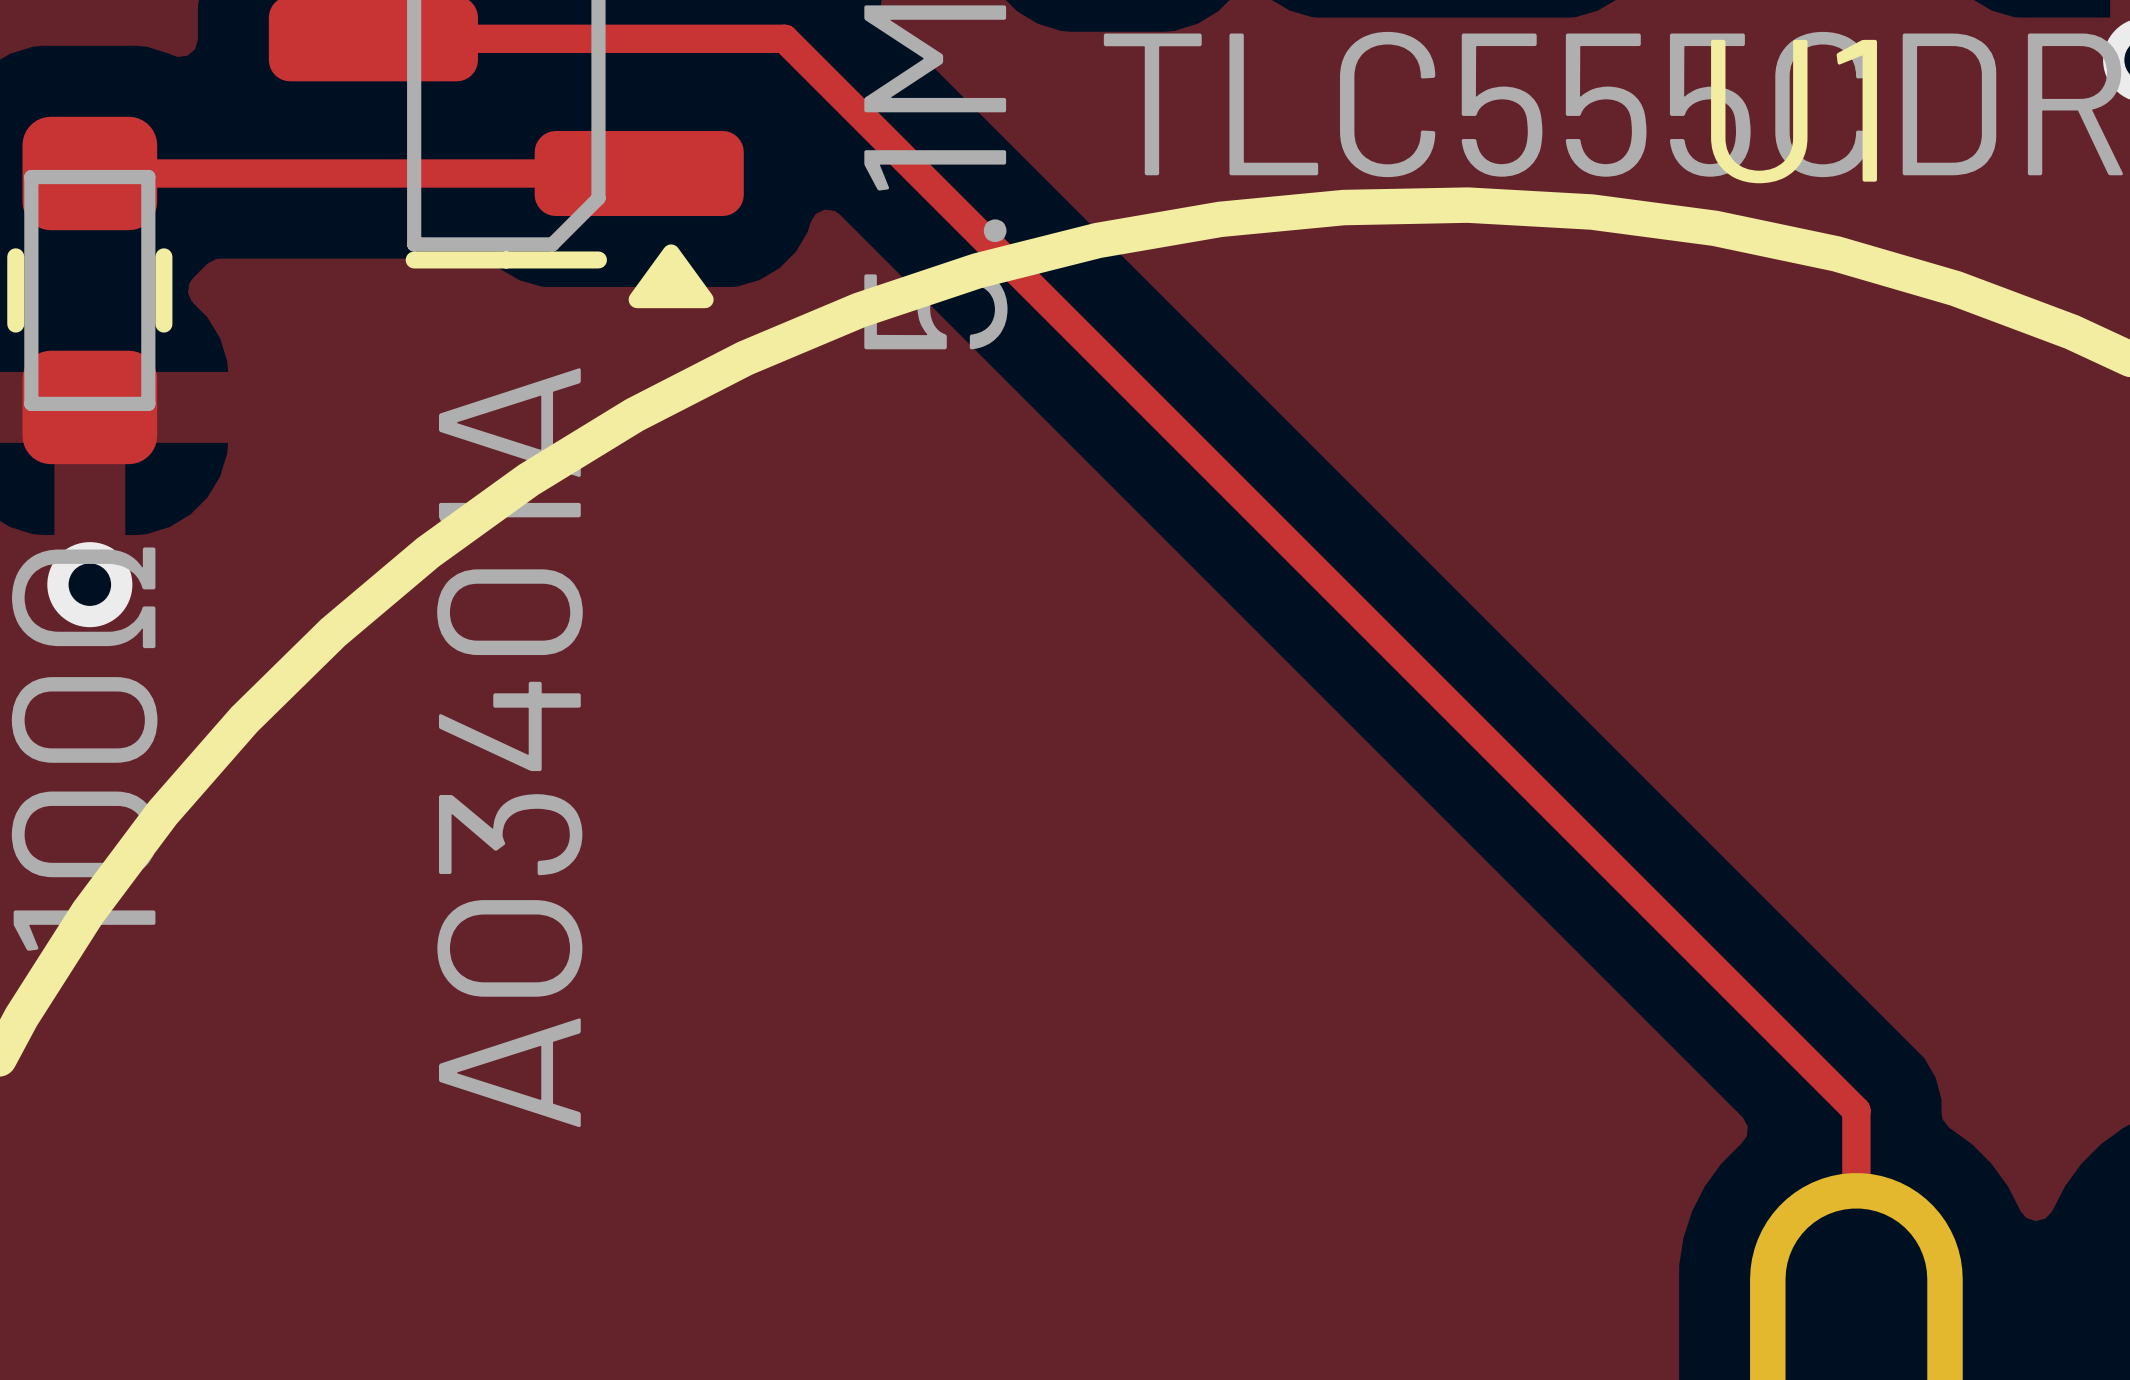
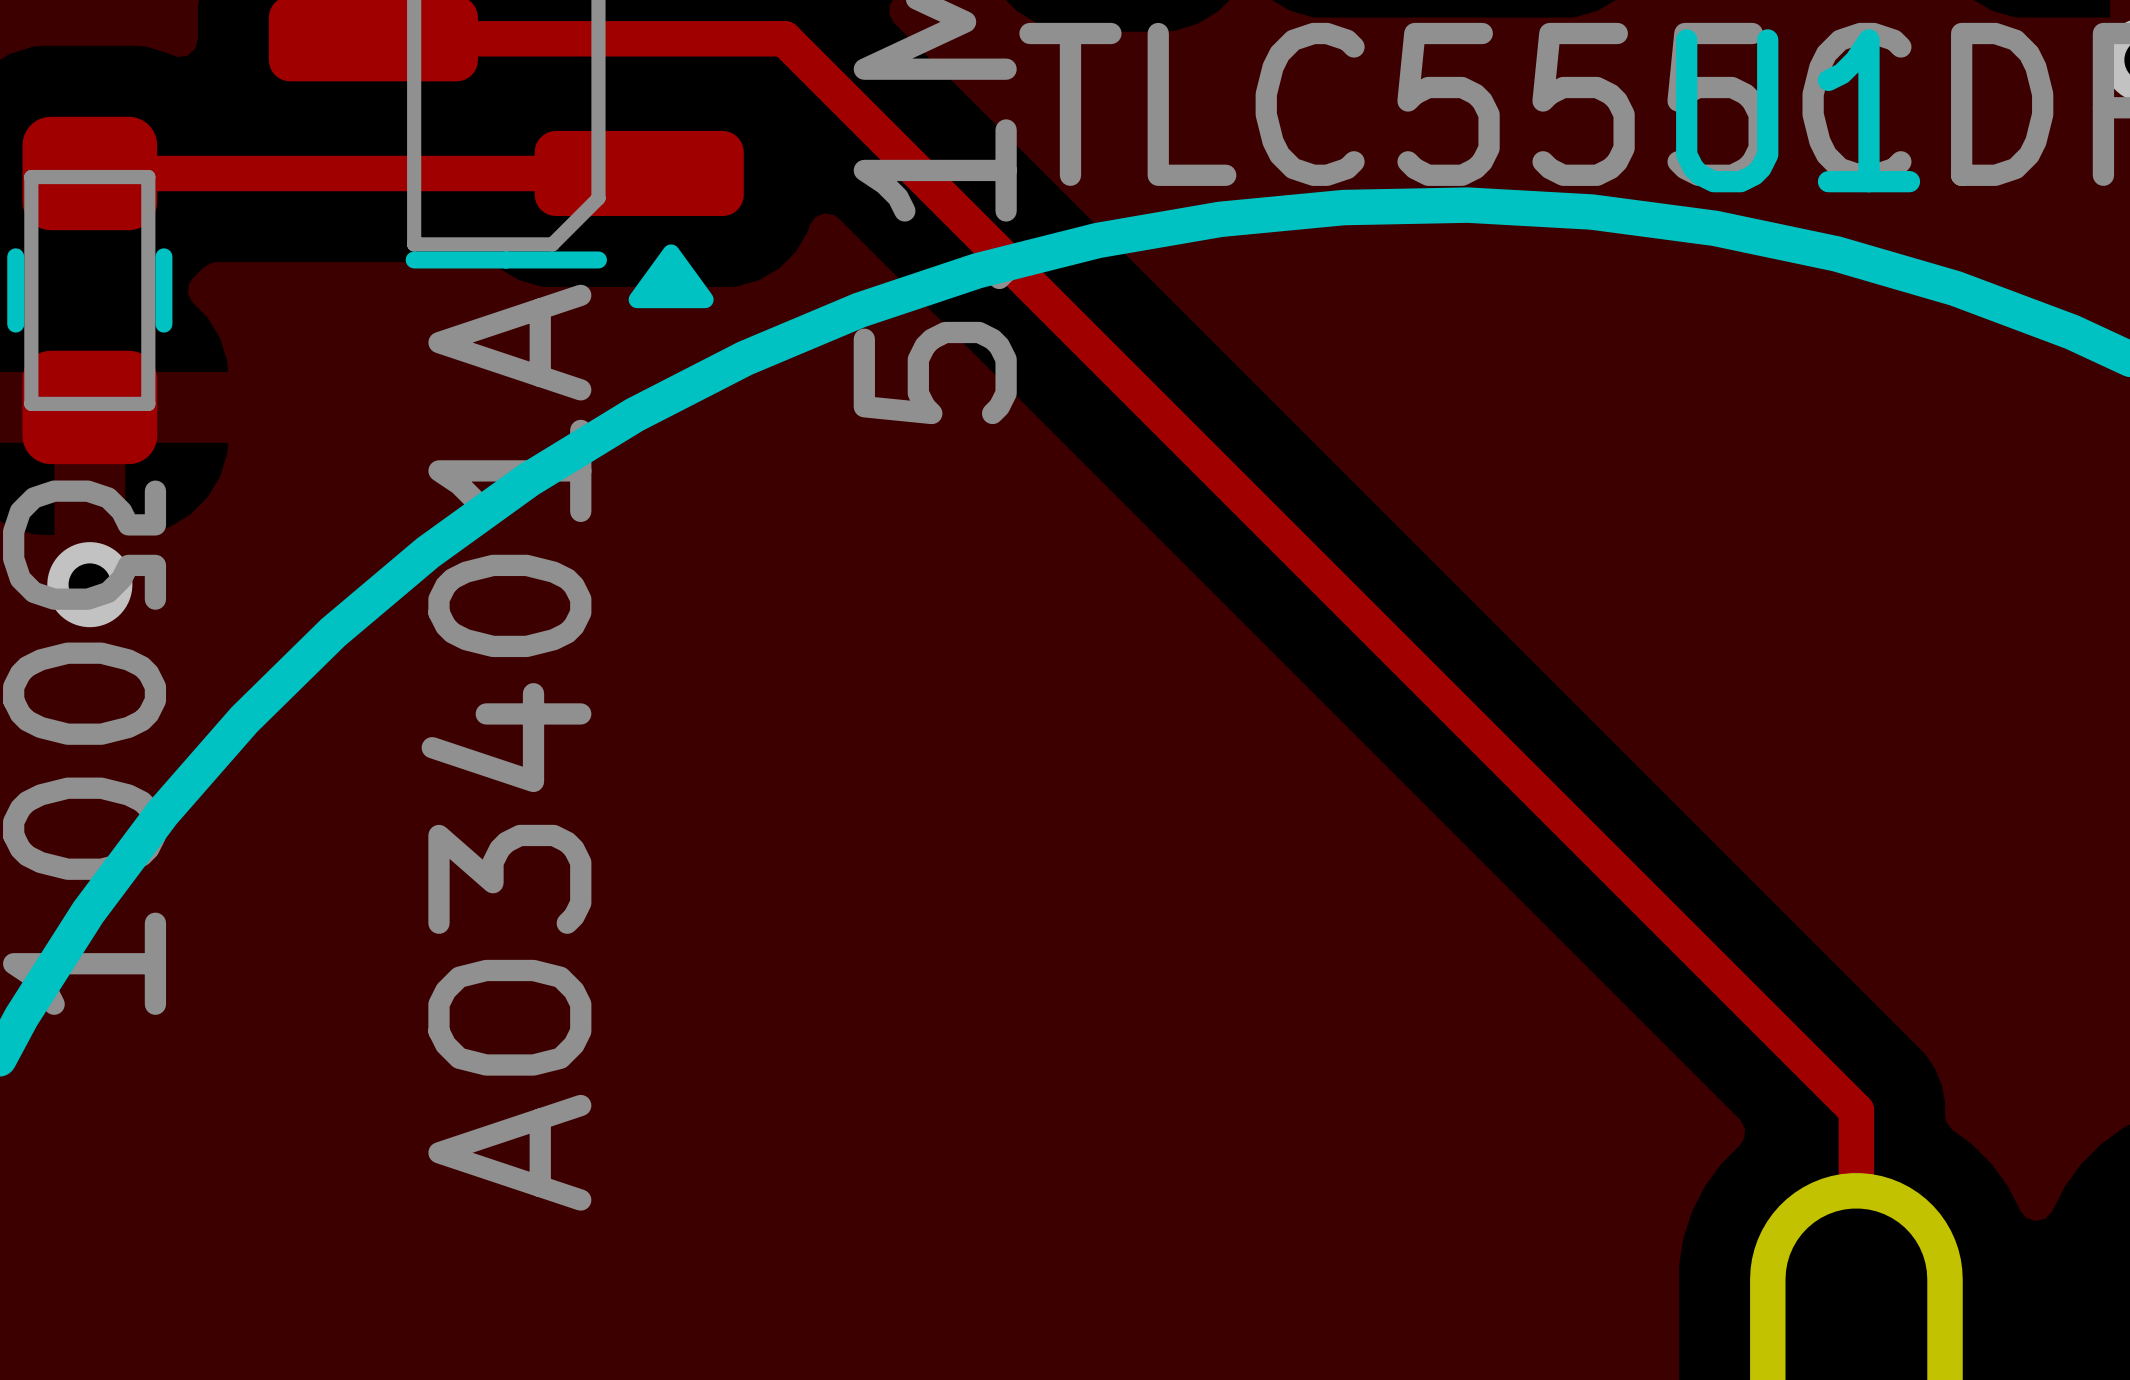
track width: thin (373, 38) (784, 38) (1856, 1110) (1856, 1350) -> thick (373, 38) (784, 38) (1856, 1110) (1856, 1350)
track width: thin (89, 173) (639, 173) -> thick (89, 173) (639, 173)

